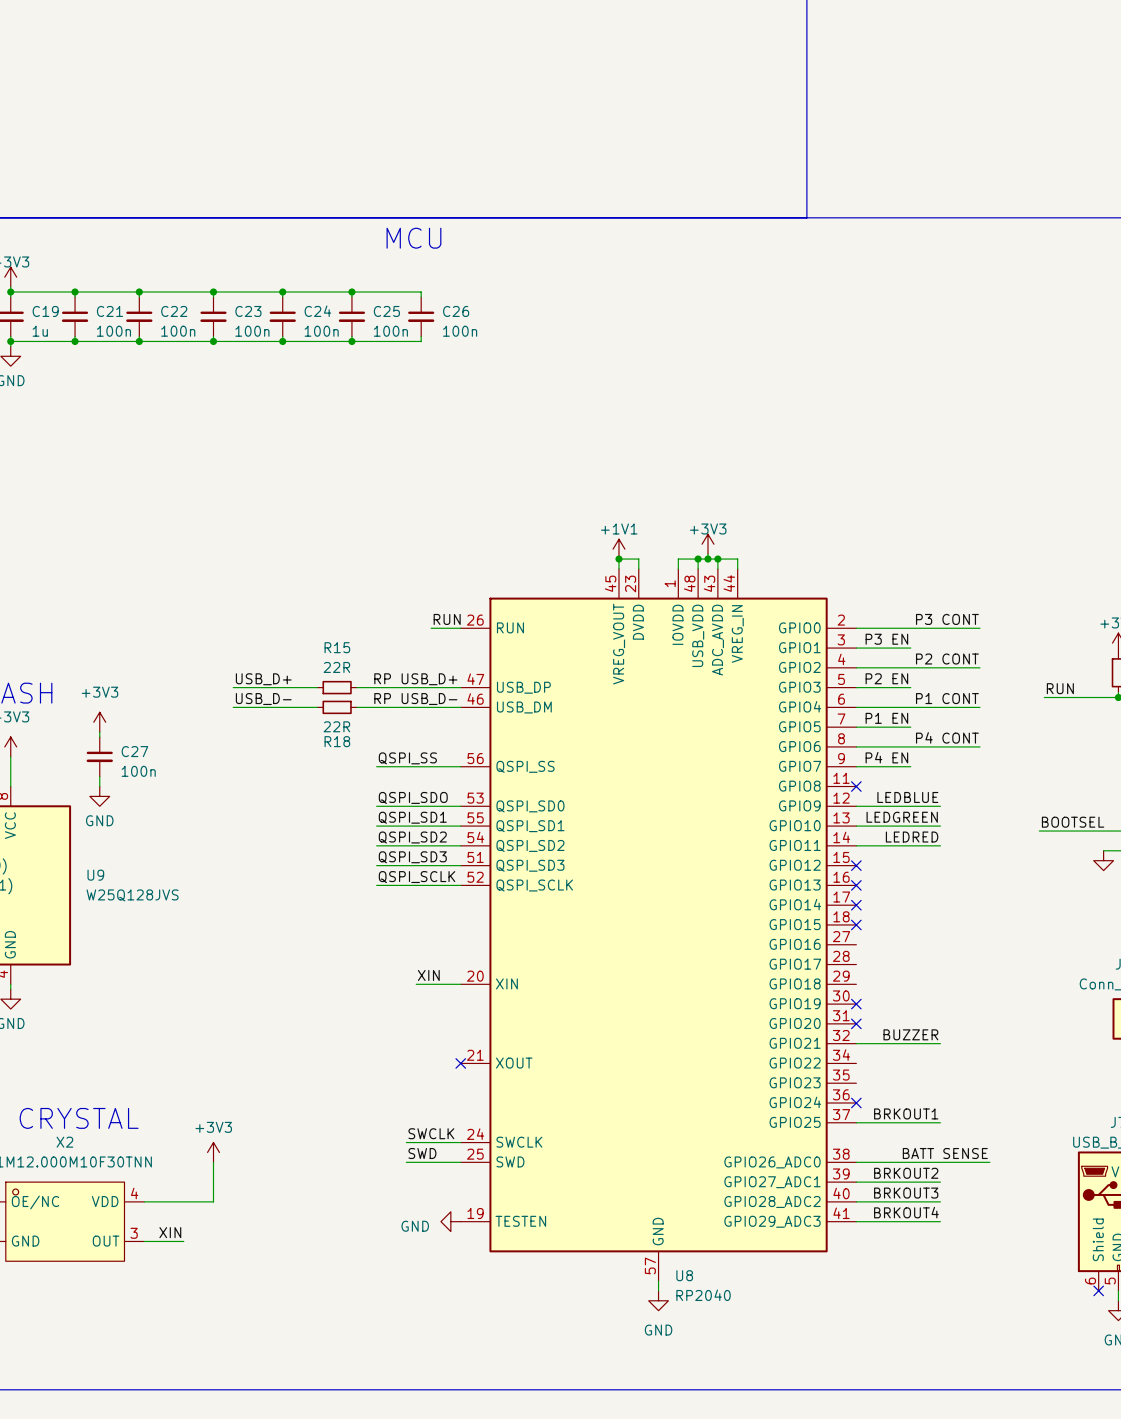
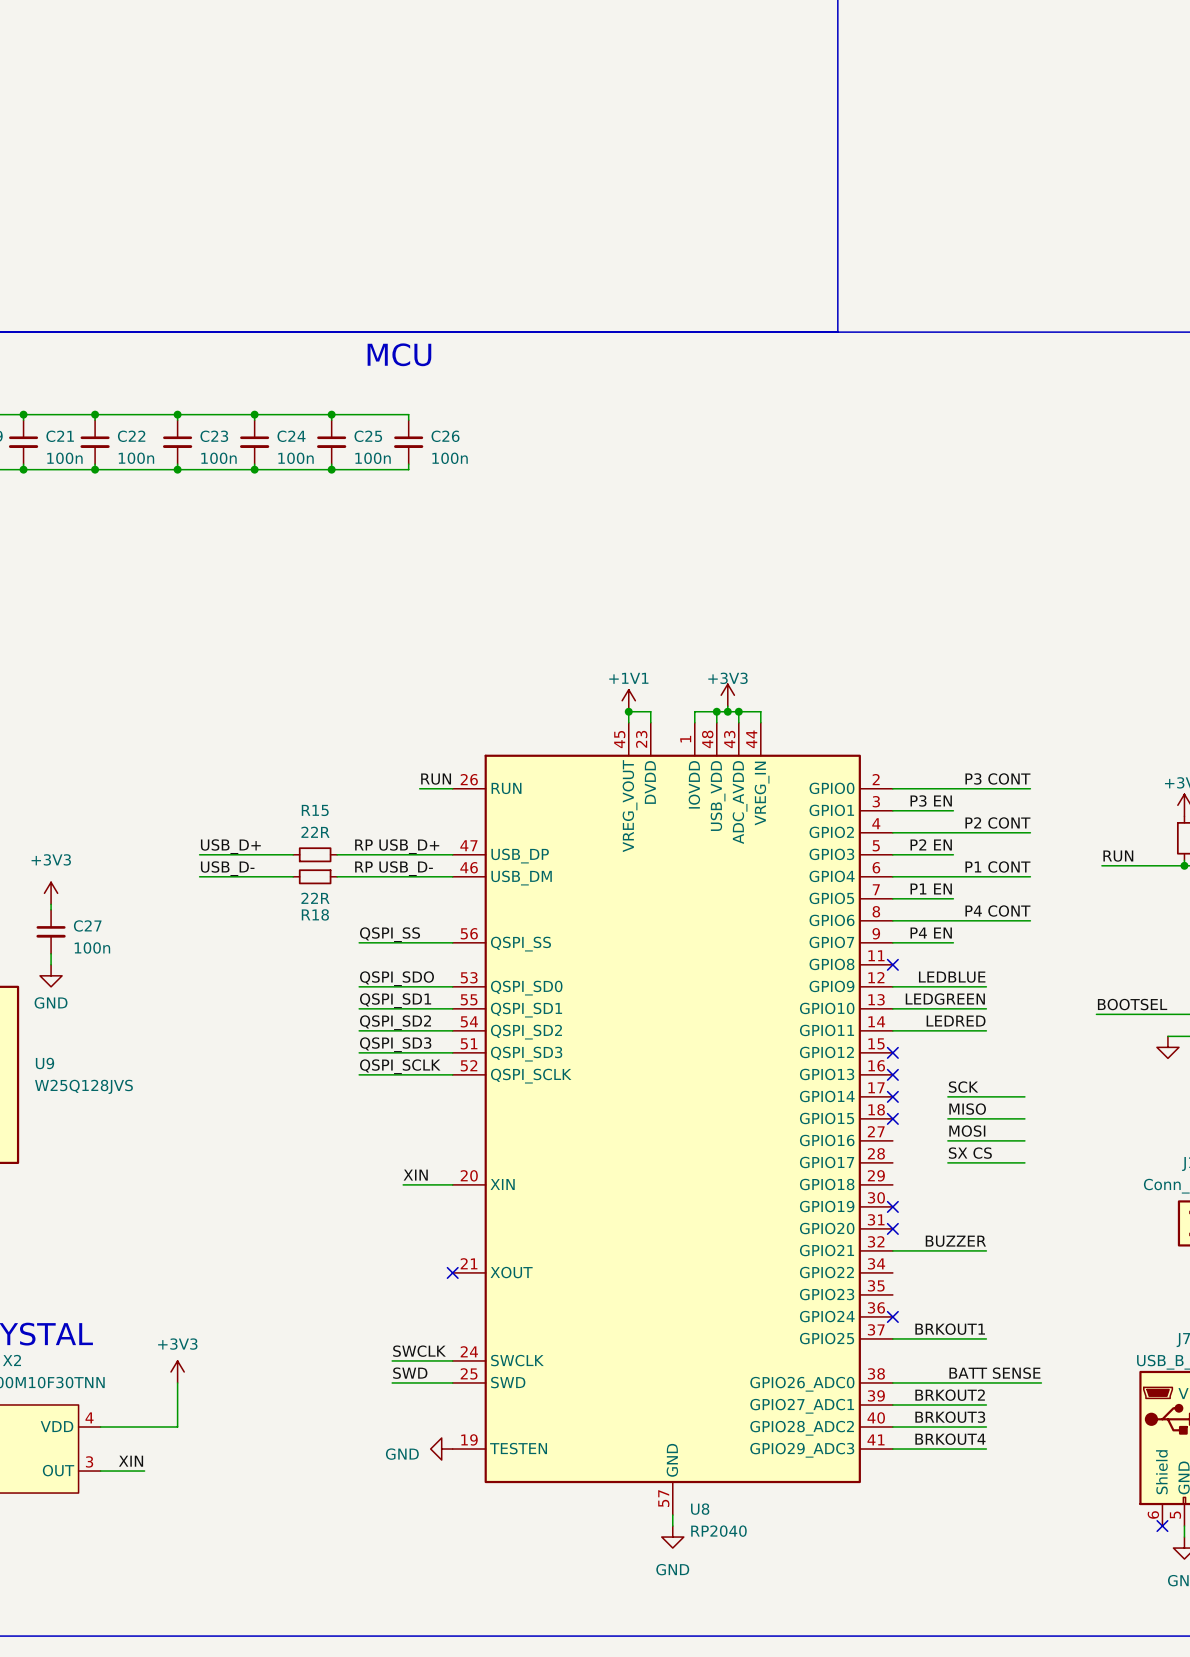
label: none -> SCK (963, 1087)
wire: none -> (947, 1096) (1024, 1096)
label: none -> MISO (967, 1109)
wire: none -> (947, 1118) (1024, 1118)
label: none -> MOSI (967, 1131)
wire: none -> (947, 1140) (1024, 1140)
label: none -> SX CS (970, 1153)
wire: none -> (947, 1162) (1024, 1162)

